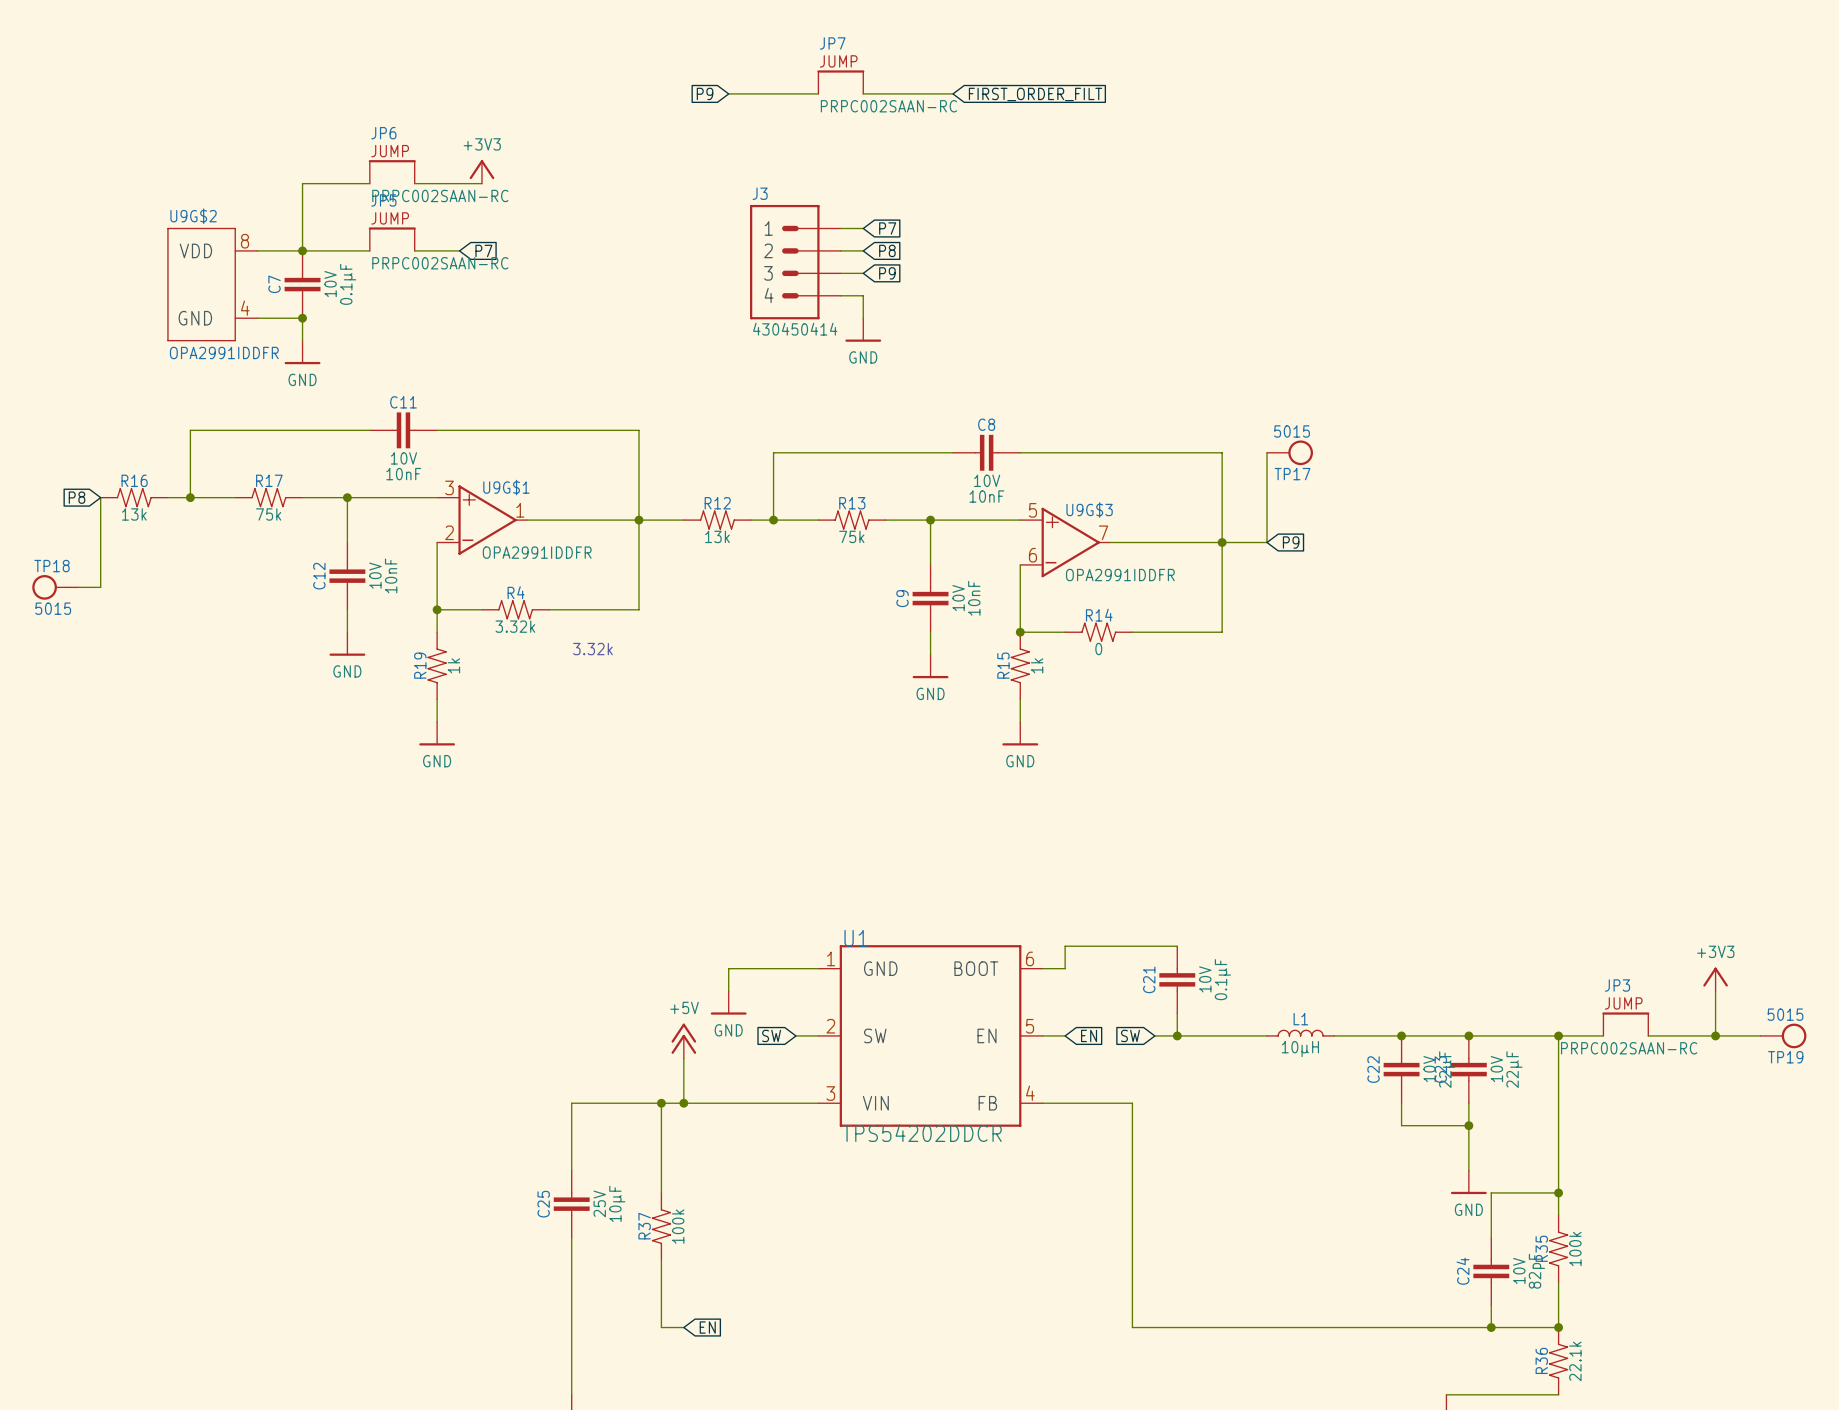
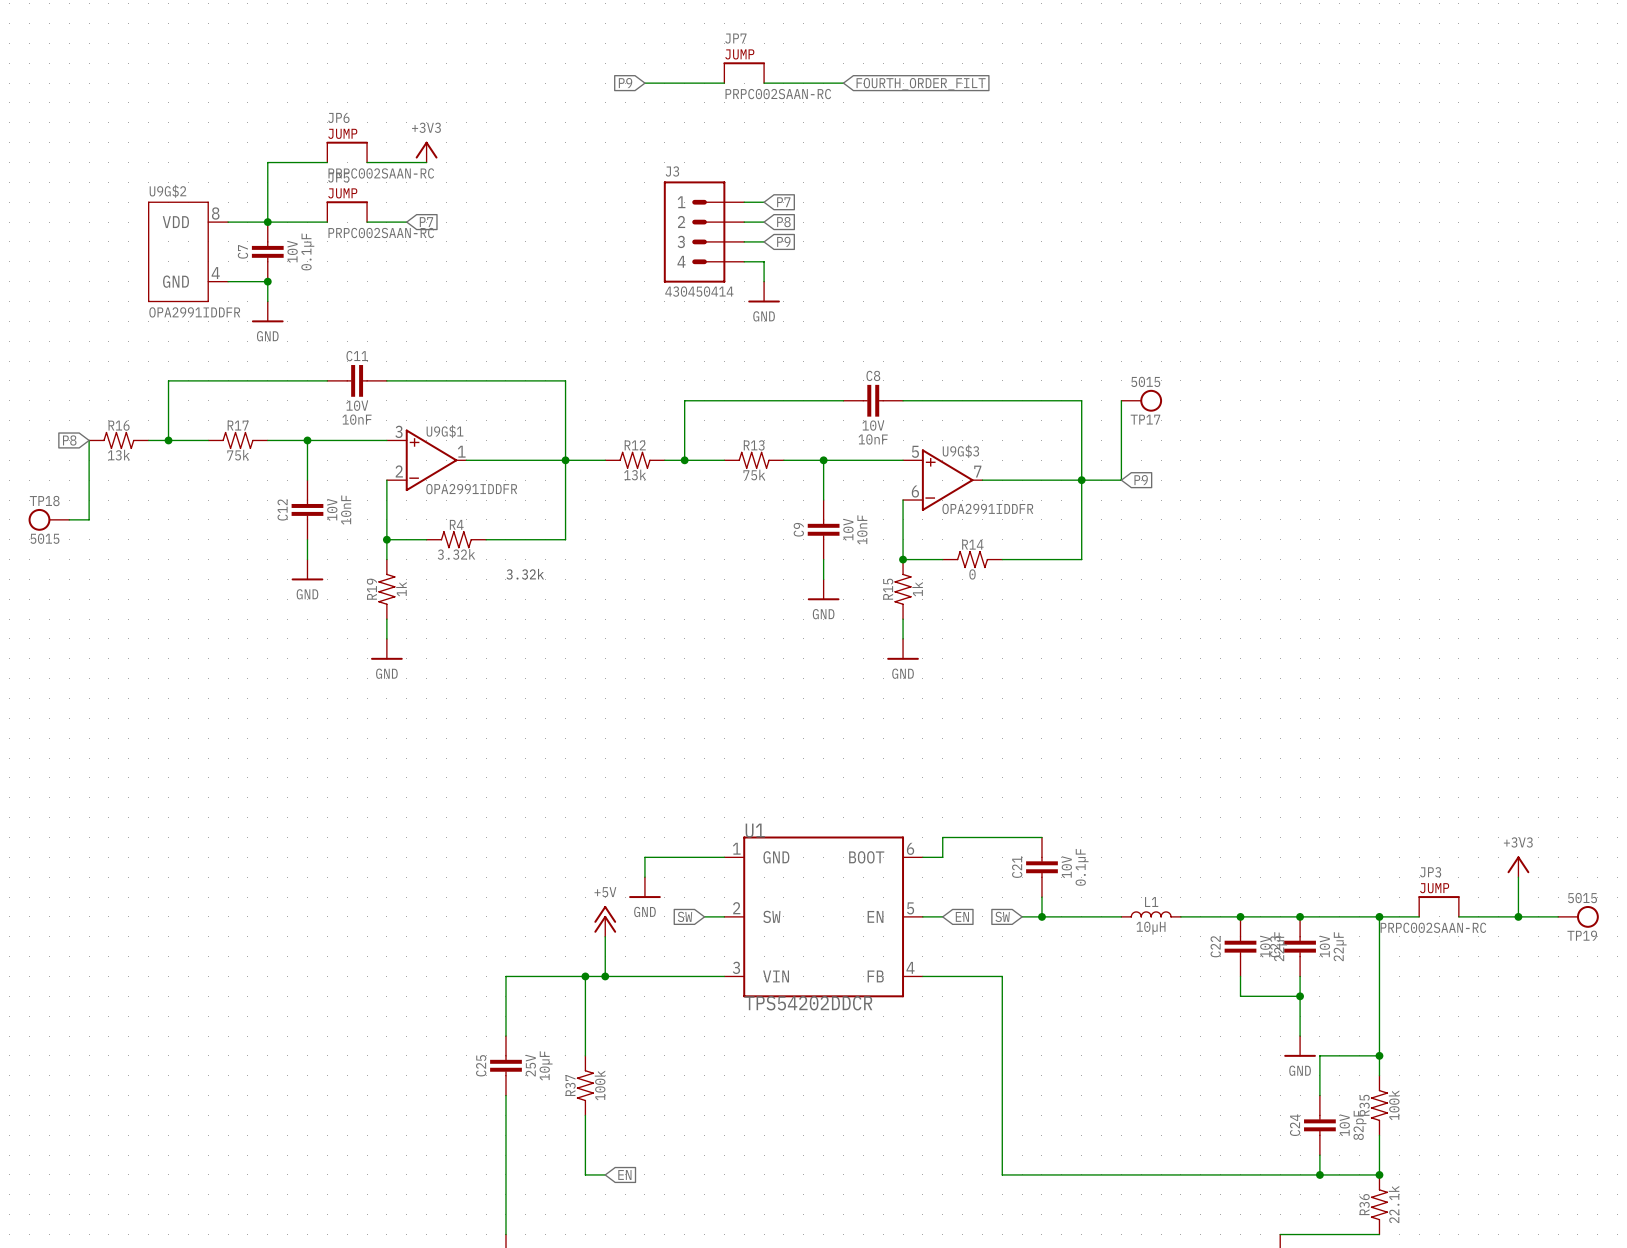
global label: FIRST_ORDER_FILT (1035, 94) -> FOURTH_ORDER_FILT (921, 84)

